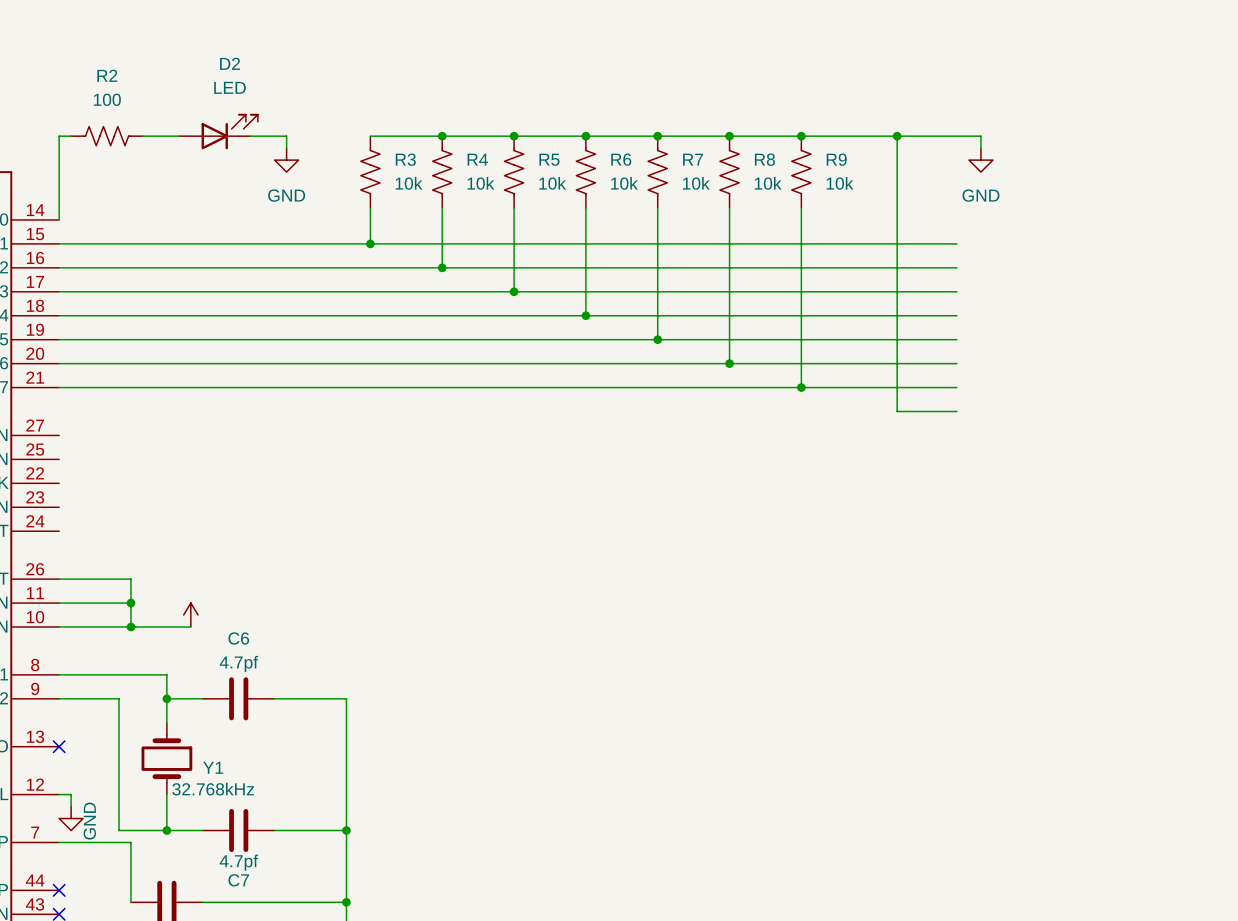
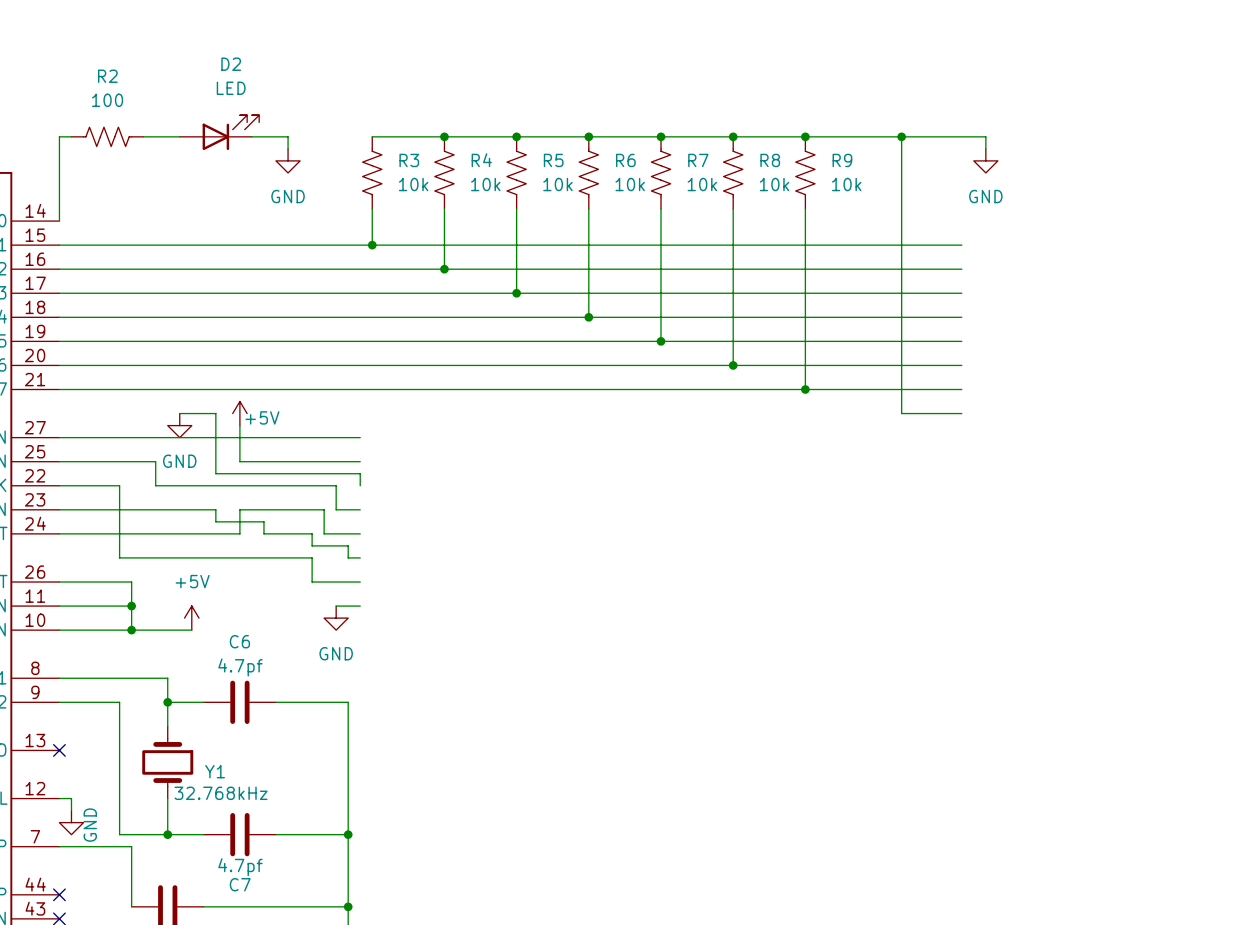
wire: none -> (179, 413) (215, 413) (215, 473) (360, 473) (360, 485)
power symbol: none -> +5V (239, 413)
power symbol: none -> GND (179, 425)
wire: none -> (239, 425) (239, 461) (360, 461)
wire: none -> (59, 437) (360, 437)
wire: none -> (59, 461) (155, 461) (155, 485) (336, 485) (336, 509) (360, 509)
wire: none -> (59, 485) (119, 485) (119, 557) (312, 557) (312, 582) (360, 582)
wire: none -> (59, 509) (215, 509) (215, 521) (263, 521) (263, 533) (312, 533) (312, 545) (348, 545) (348, 557) (360, 557)
wire: none -> (59, 533) (239, 533) (239, 509) (324, 509) (324, 533) (360, 533)
power symbol text: none -> +5V (192, 581)
wire: none -> (336, 606) (360, 606)
power symbol: none -> GND (336, 618)

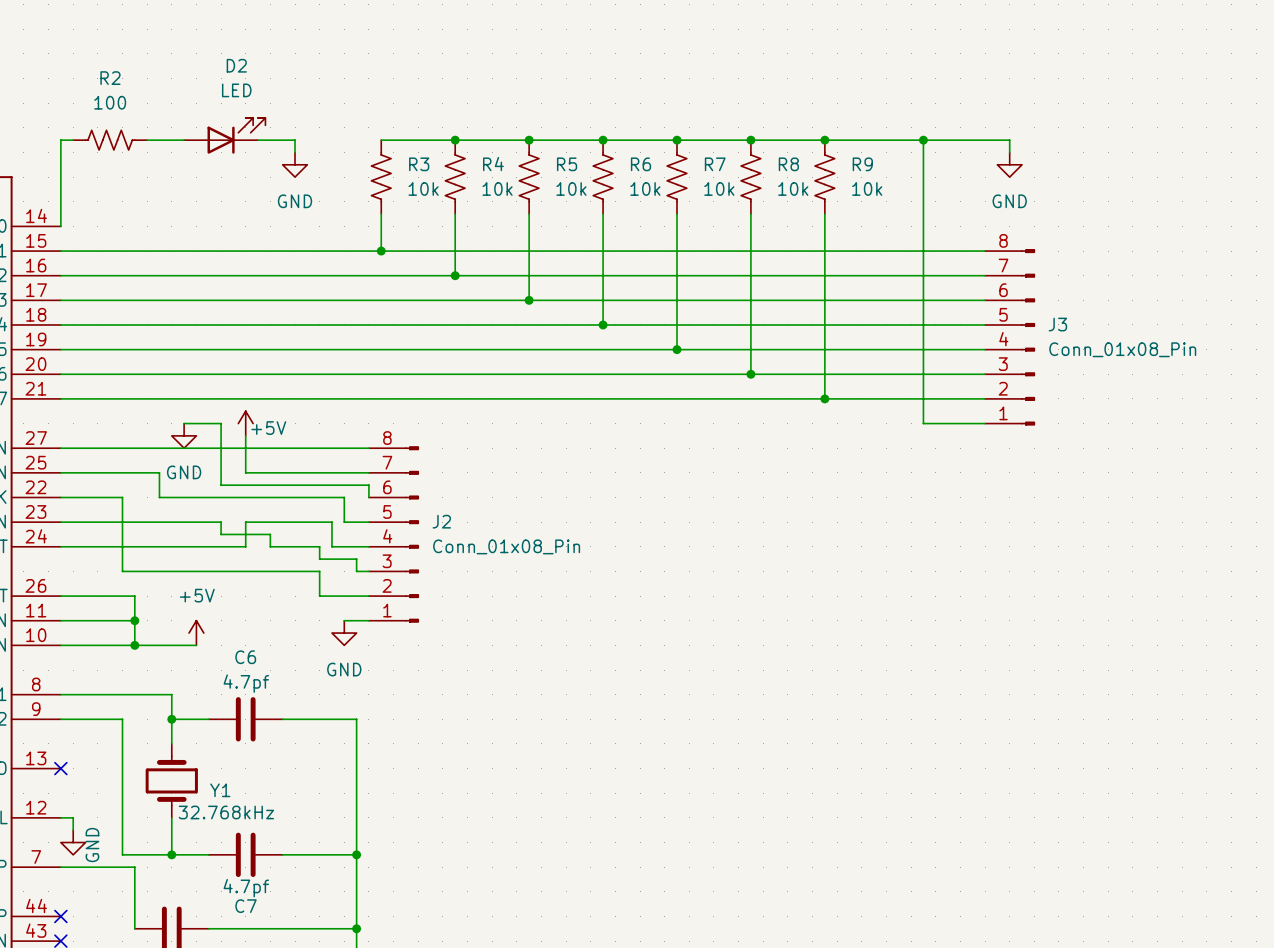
J3: none -> Conn_01x08_Pin (1010, 337)
J2: none -> Conn_01x08_Pin (393, 534)

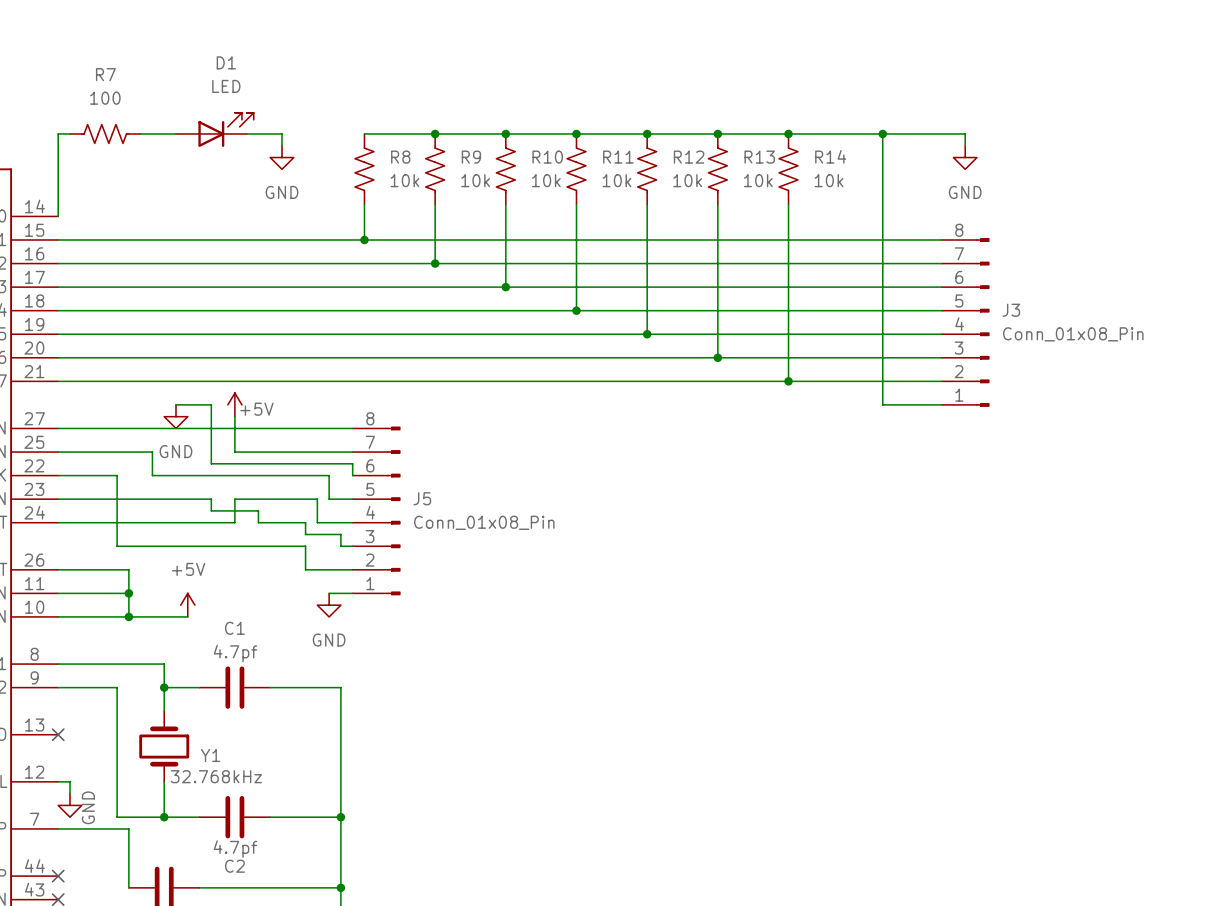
D2 name: D2 (236, 65) -> D1 (226, 62)
R2 name: R2 (110, 78) -> R7 (105, 74)
R3 name: R3 (419, 164) -> R8 (400, 157)
R4 name: R4 (493, 164) -> R9 (471, 157)
R5 name: R5 (567, 164) -> R10 (547, 157)
R6 name: R6 (641, 164) -> R11 (618, 157)
R7 name: R7 (715, 164) -> R12 (689, 157)
R8 name: R8 (788, 164) -> R13 (759, 157)
R9 name: R9 (862, 164) -> R14 (830, 156)
J2 name: J2 (441, 521) -> J5 (422, 498)
C6 name: C6 (245, 657) -> C1 (234, 628)
C7 name: C7 (246, 906) -> C2 (234, 866)

